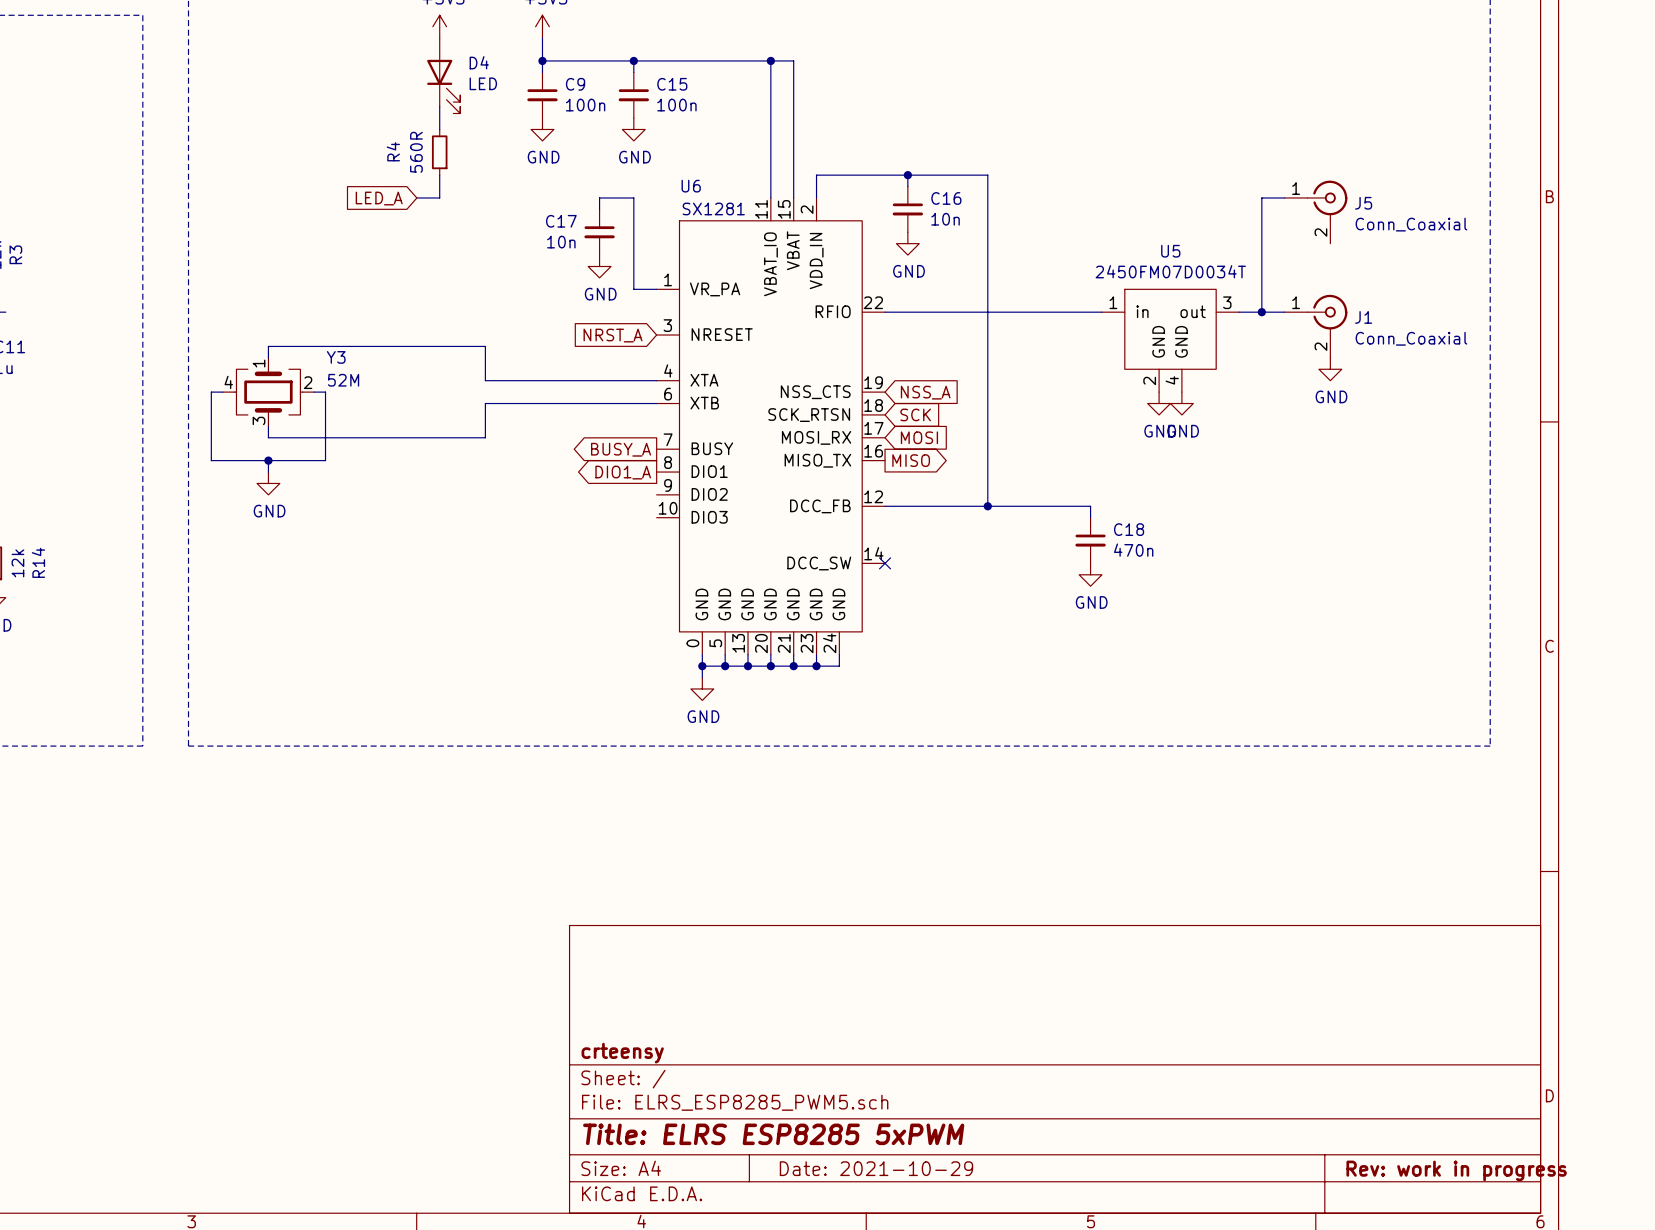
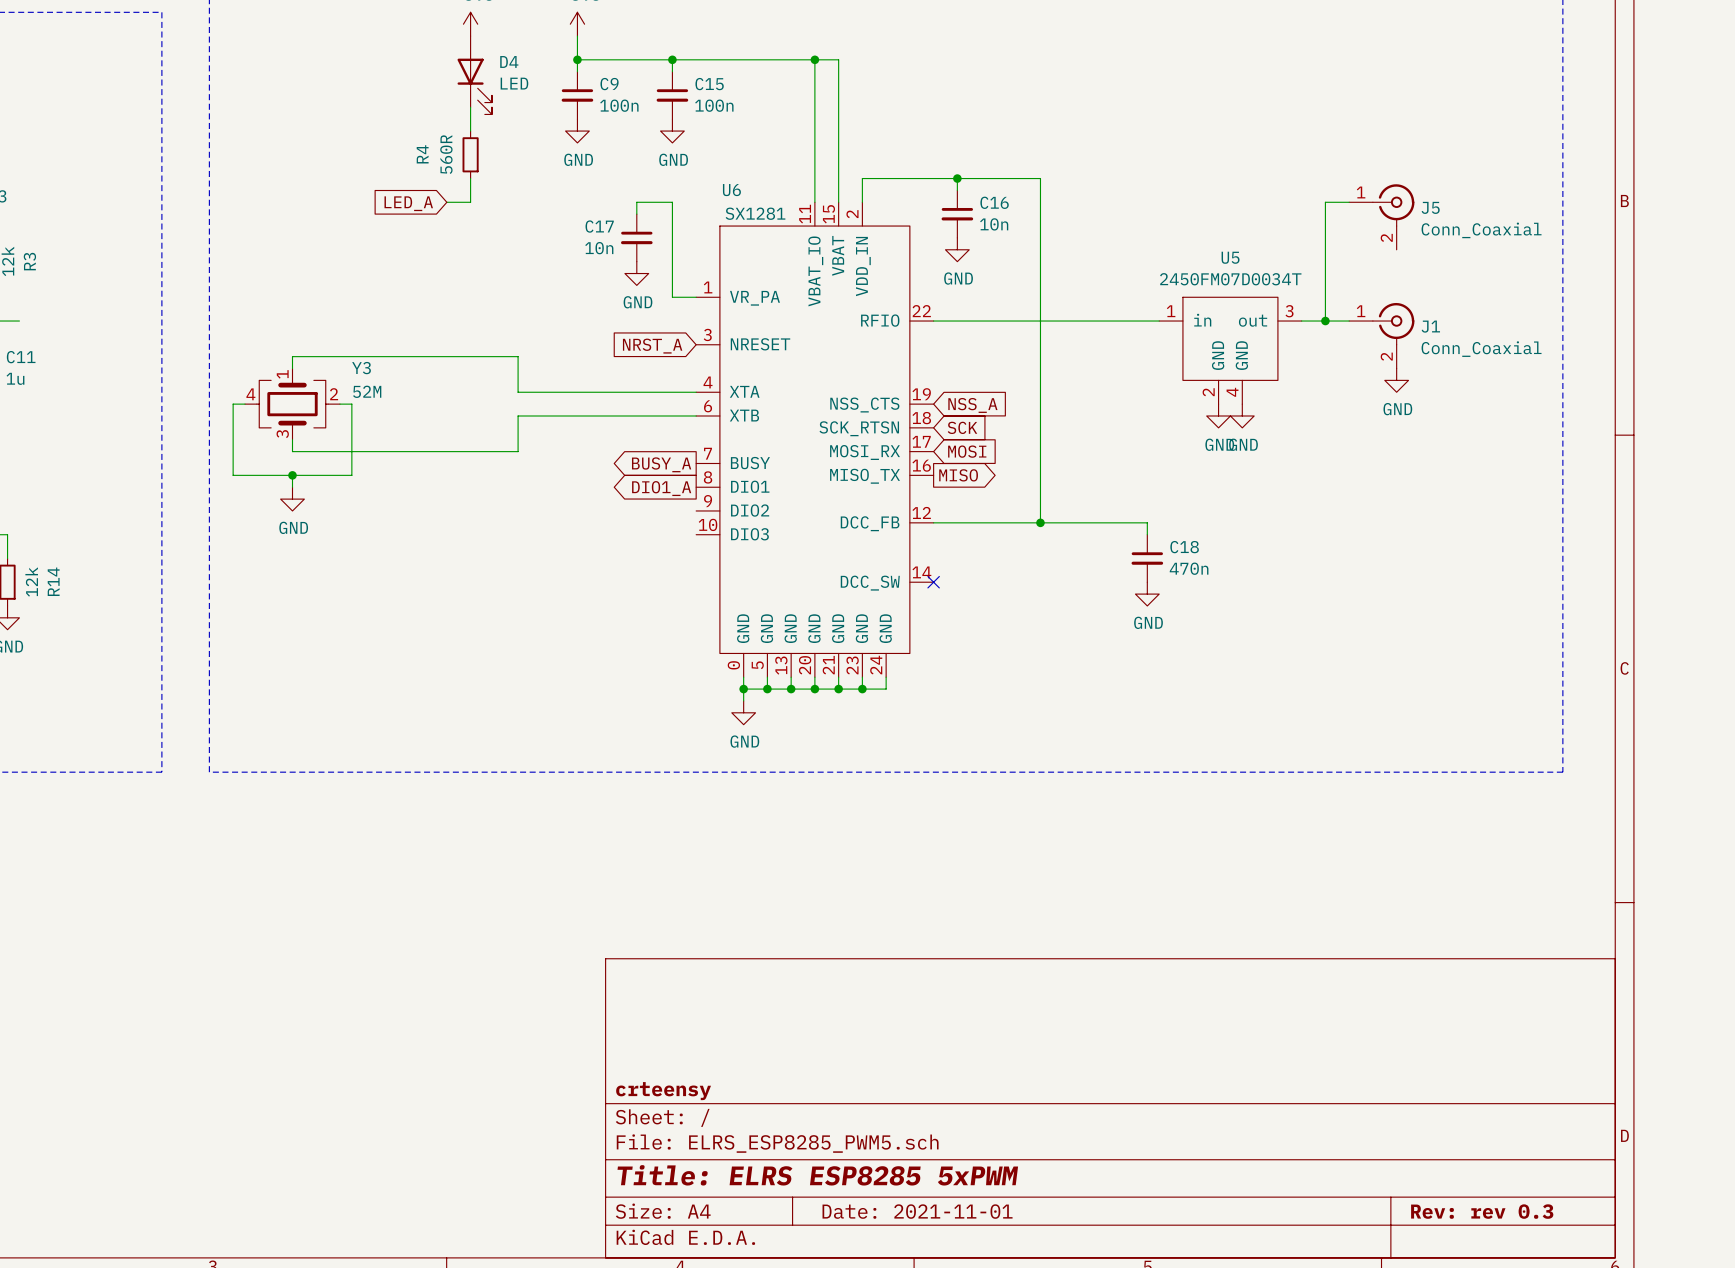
title block: Date: 2021-10-29 (876, 1168) -> Date: 2021-11-01 (917, 1211)
title block: Rev: work in progress (1456, 1170) -> Rev: rev 0.3 (1482, 1211)

